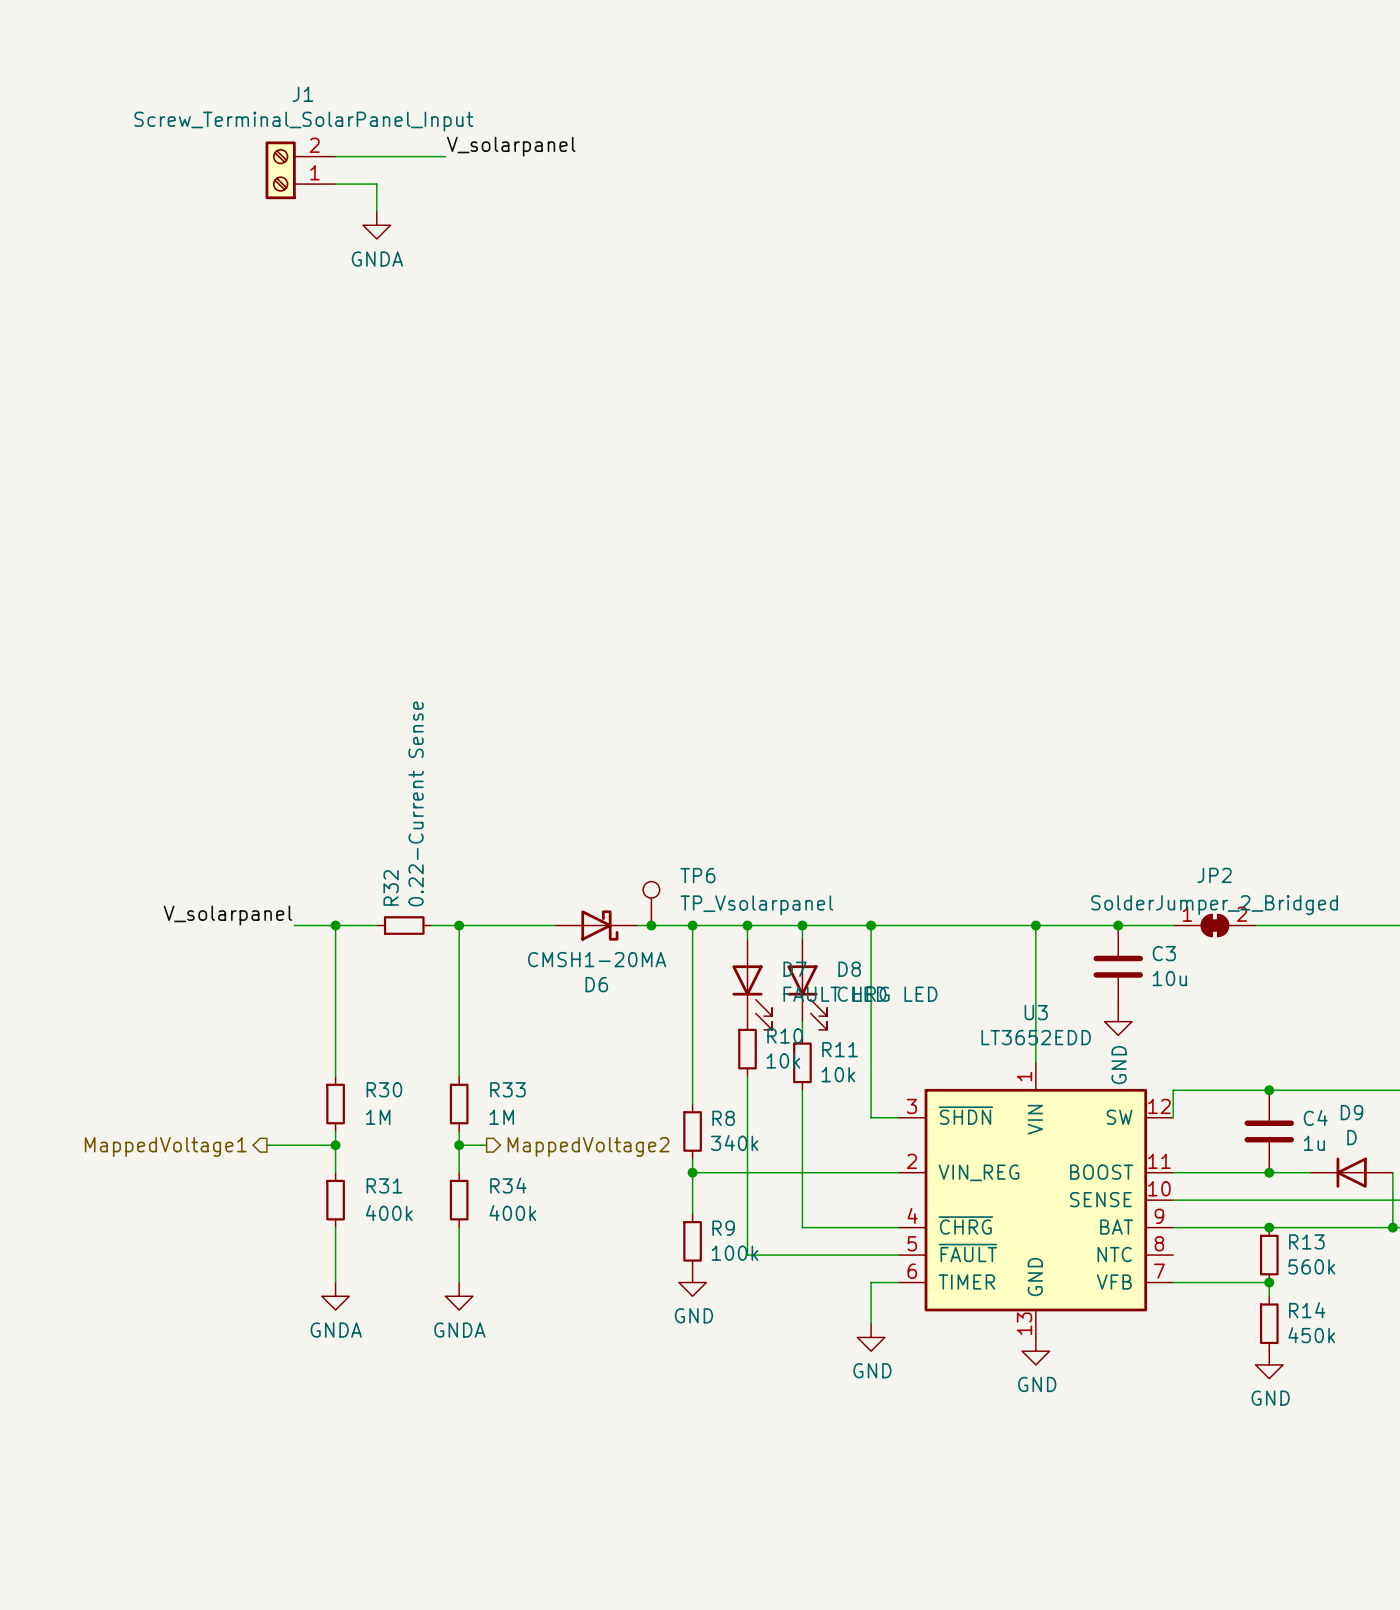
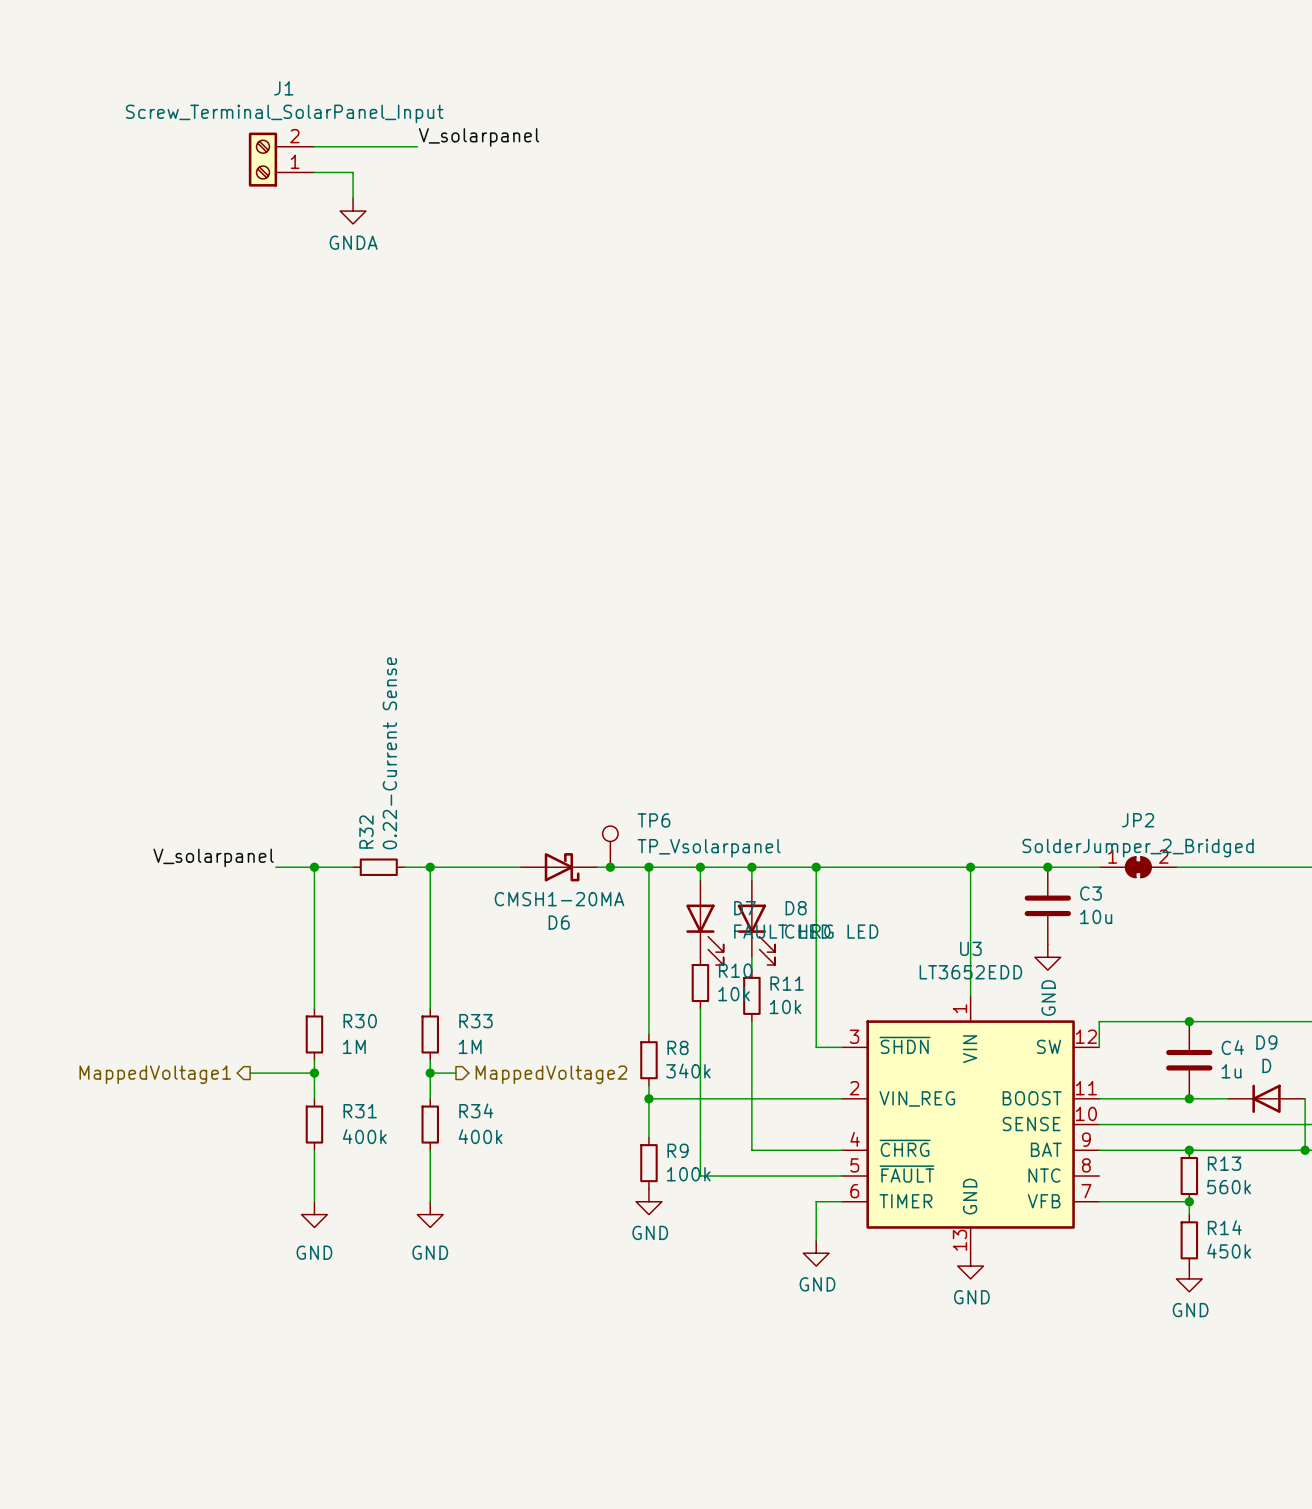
power symbol: GNDA (335, 1296) -> GND (314, 1214)
power symbol: GNDA (459, 1296) -> GND (430, 1214)

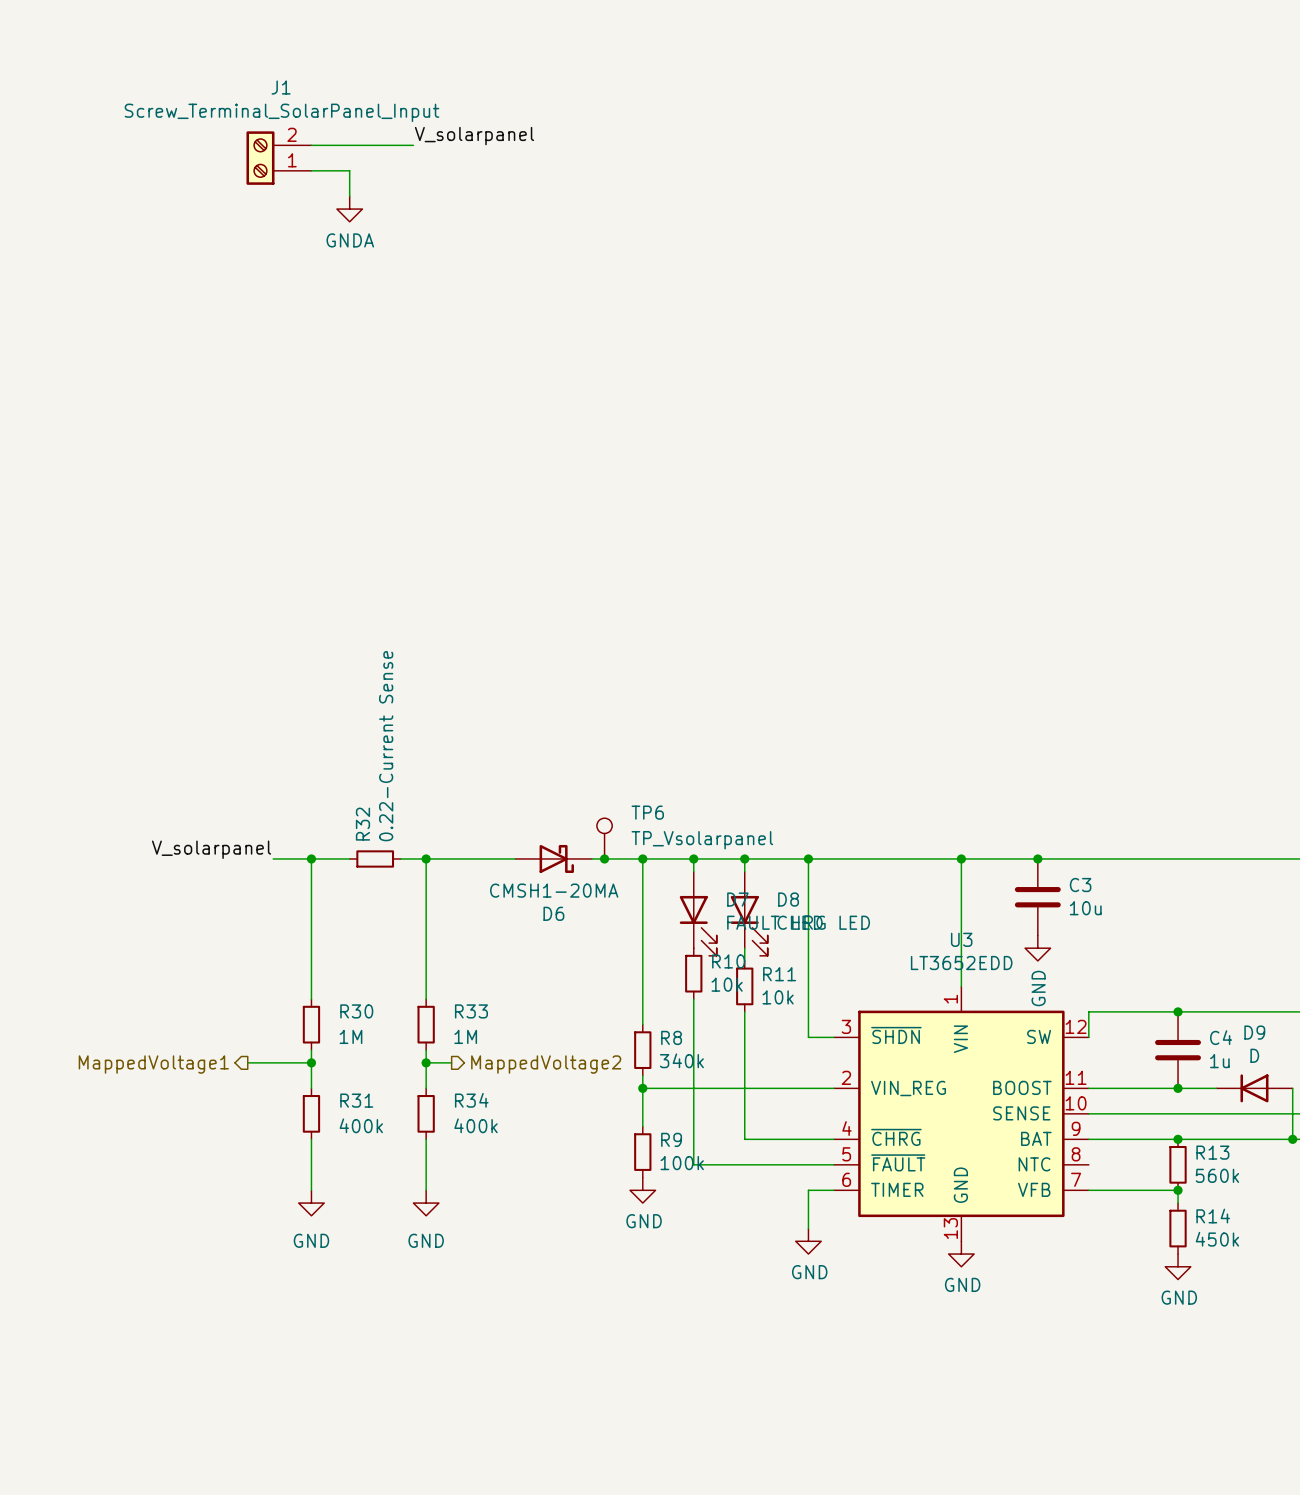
JP2: SolderJumper_2_Bridged (1138, 867) -> none

